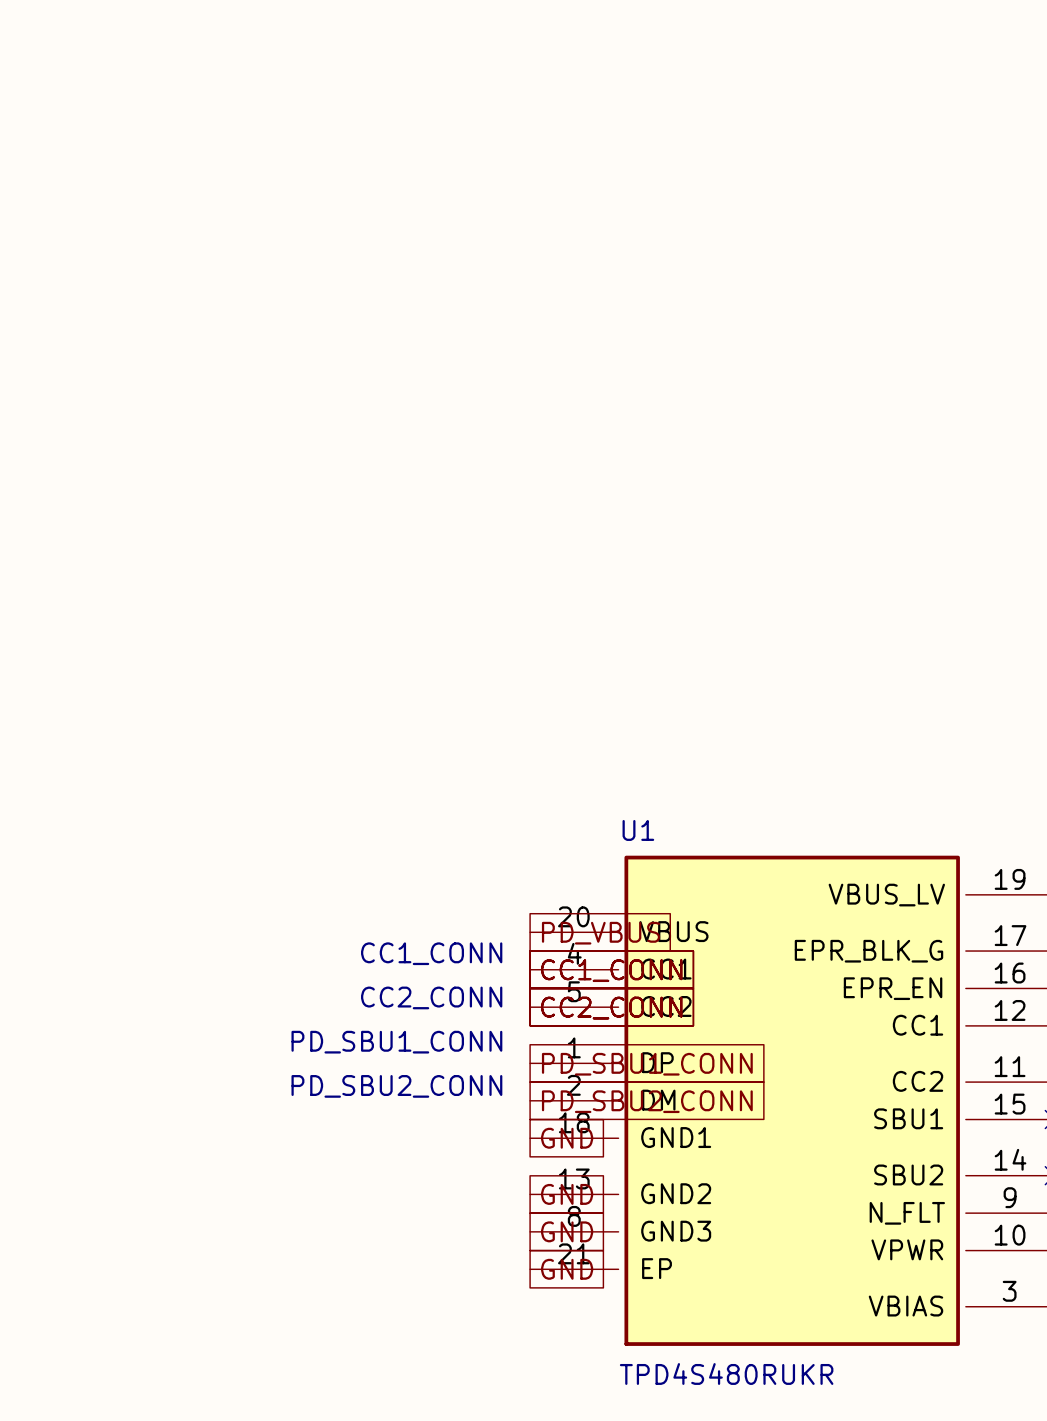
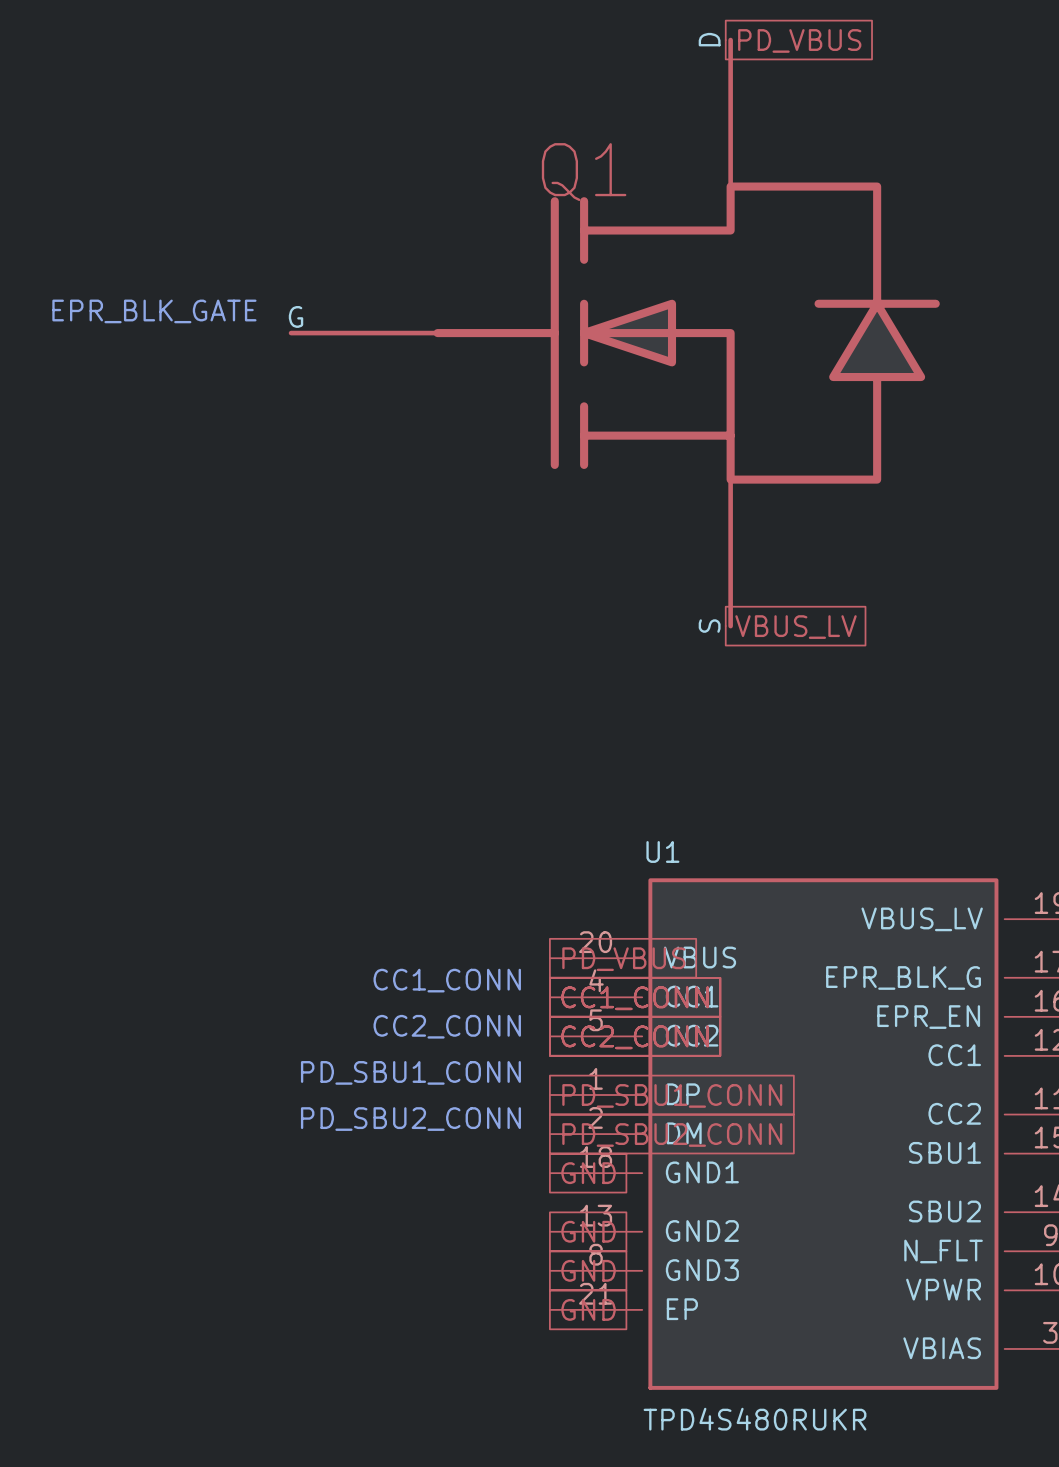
global label: none -> PD_VBUS (799, 40)
text: none -> EPR_BLK_GATE (154, 311)
part: none -> (614, 333)
global label: none -> VBUS_LV (796, 627)

